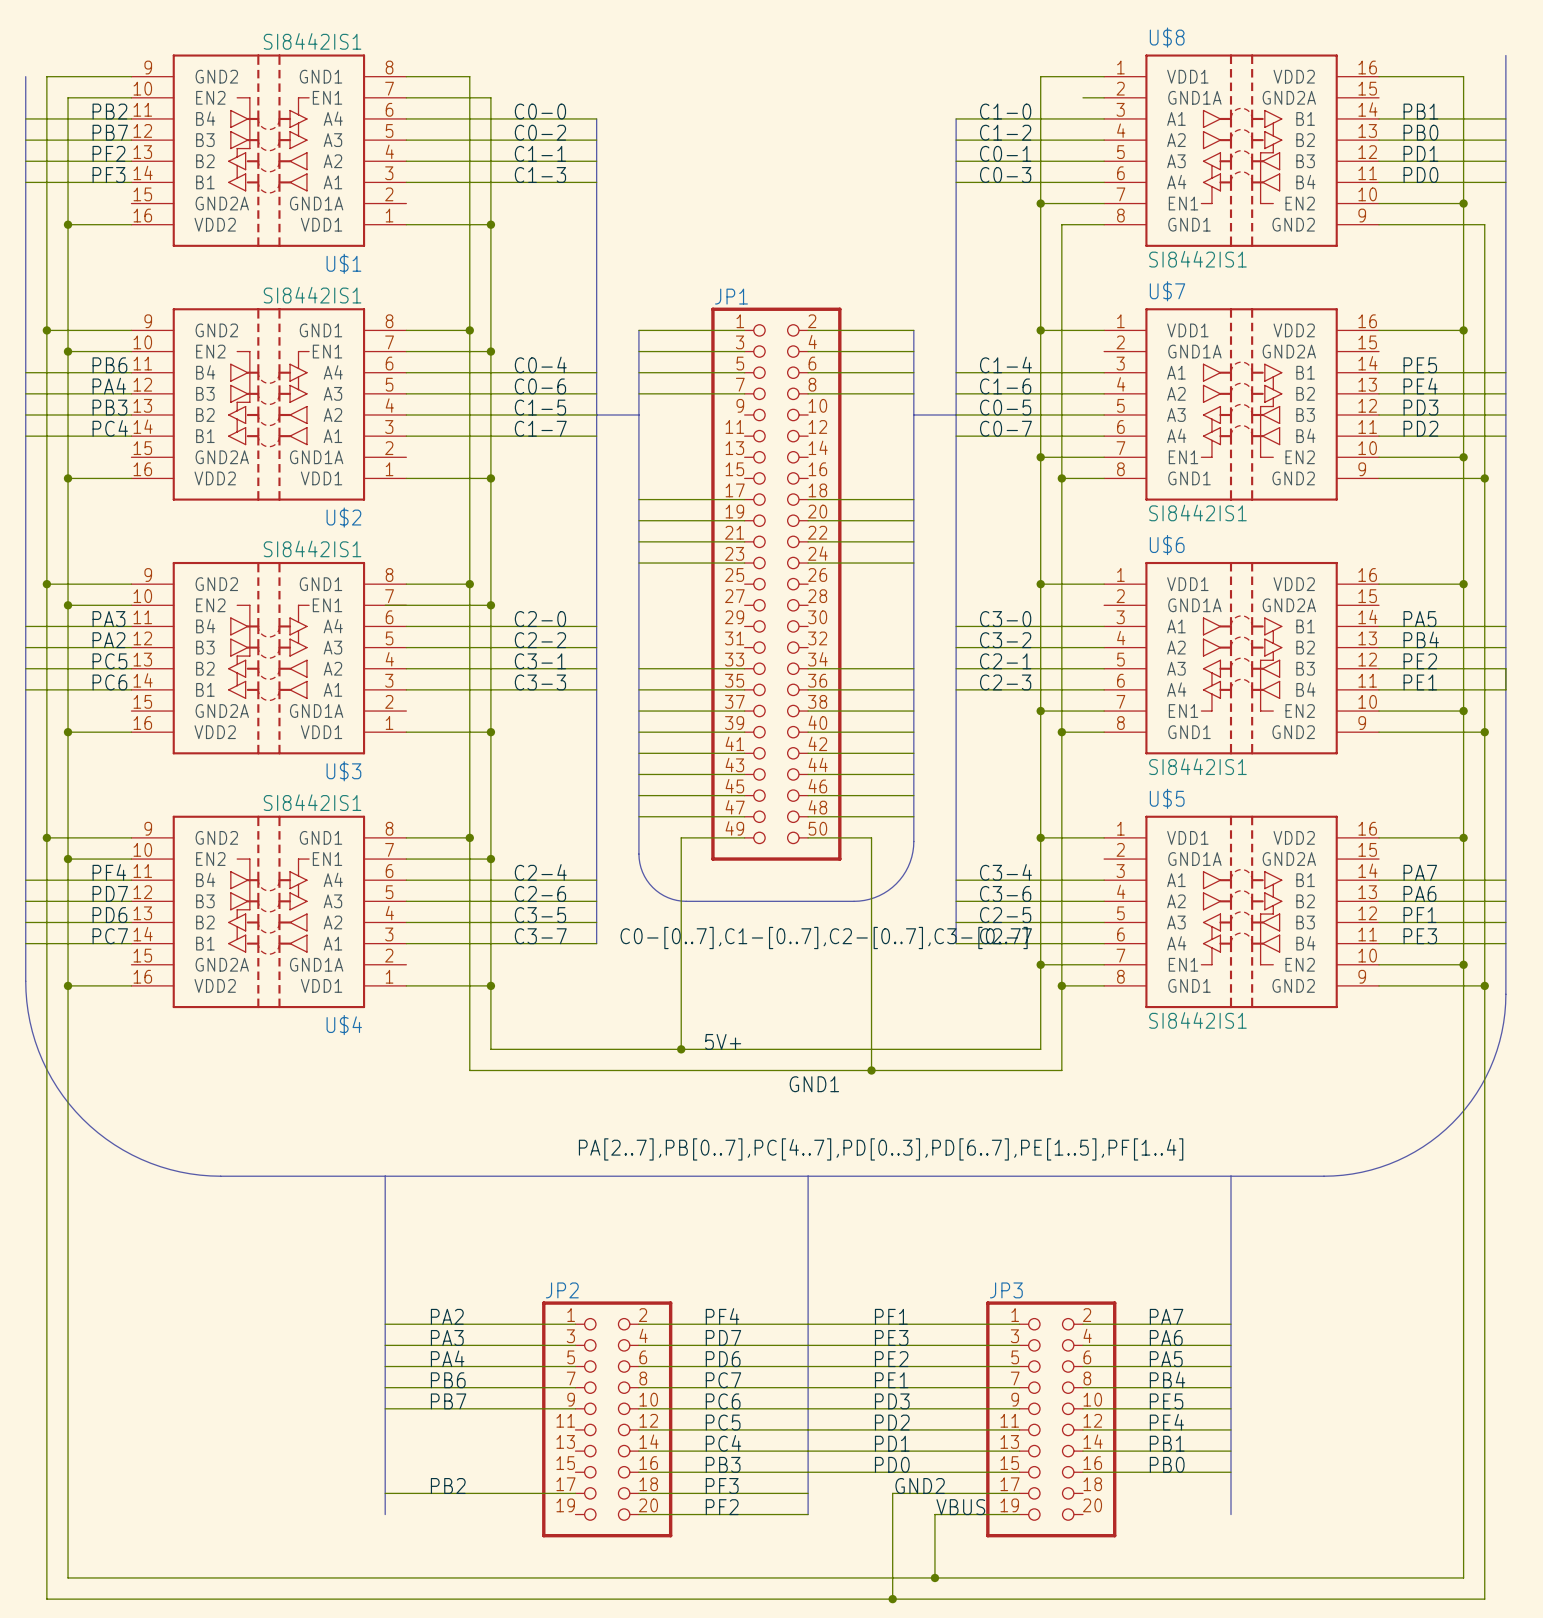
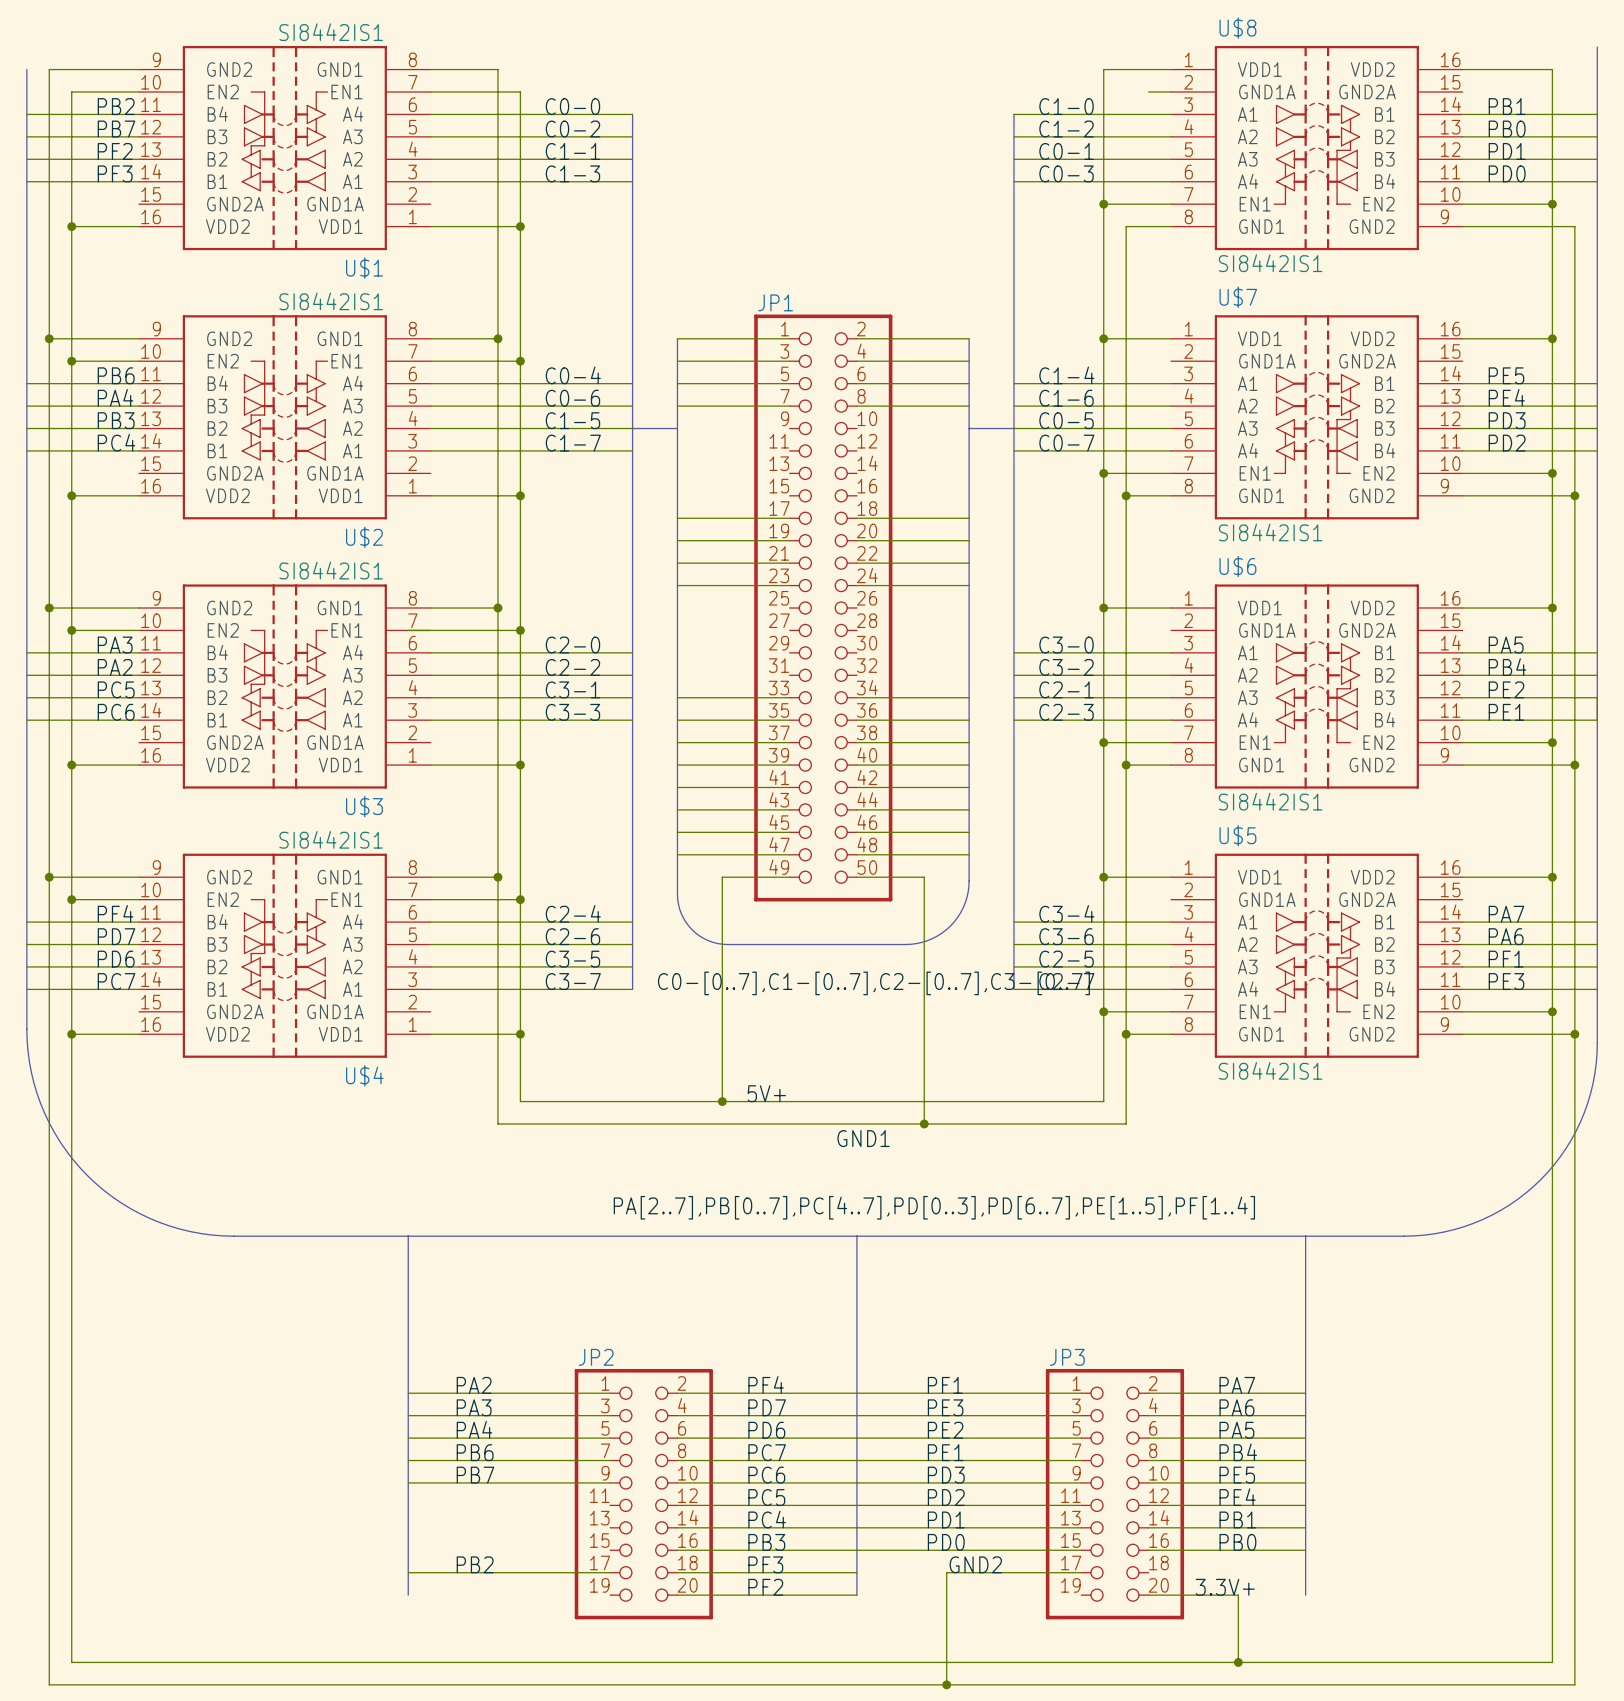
label: VBUS (960, 1507) -> none
label: none -> 3.3V+ (1225, 1587)
wire: (1019, 1514) (934, 1514) (934, 1577) -> none
wire: none -> (1148, 1595) (1238, 1595) (1238, 1662)
junction: (934, 1577) -> none
junction: none -> (1238, 1662)

